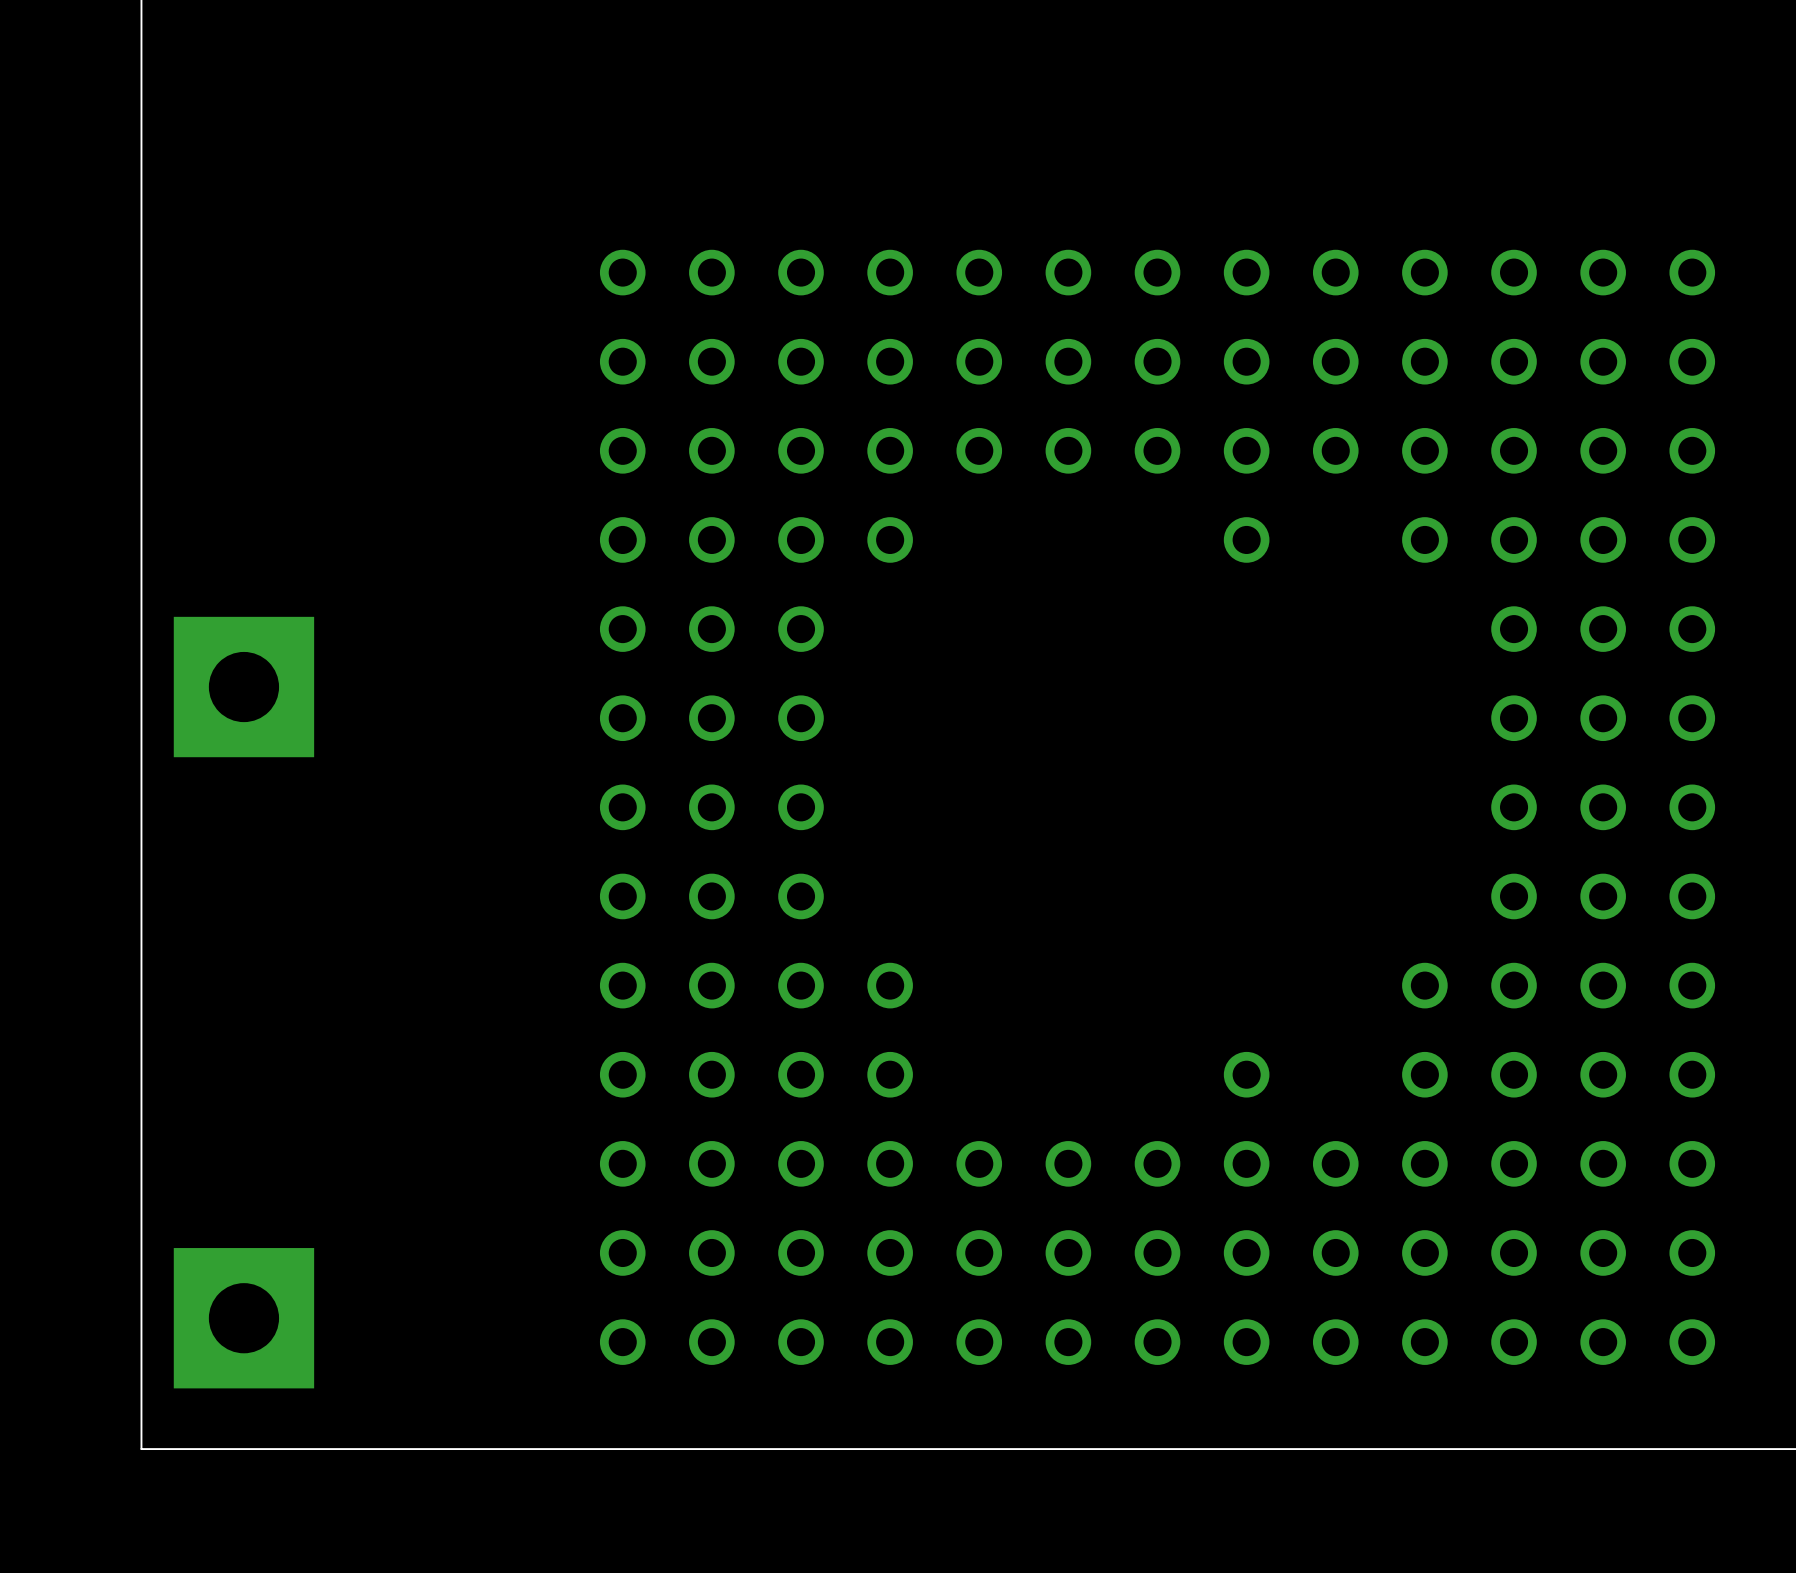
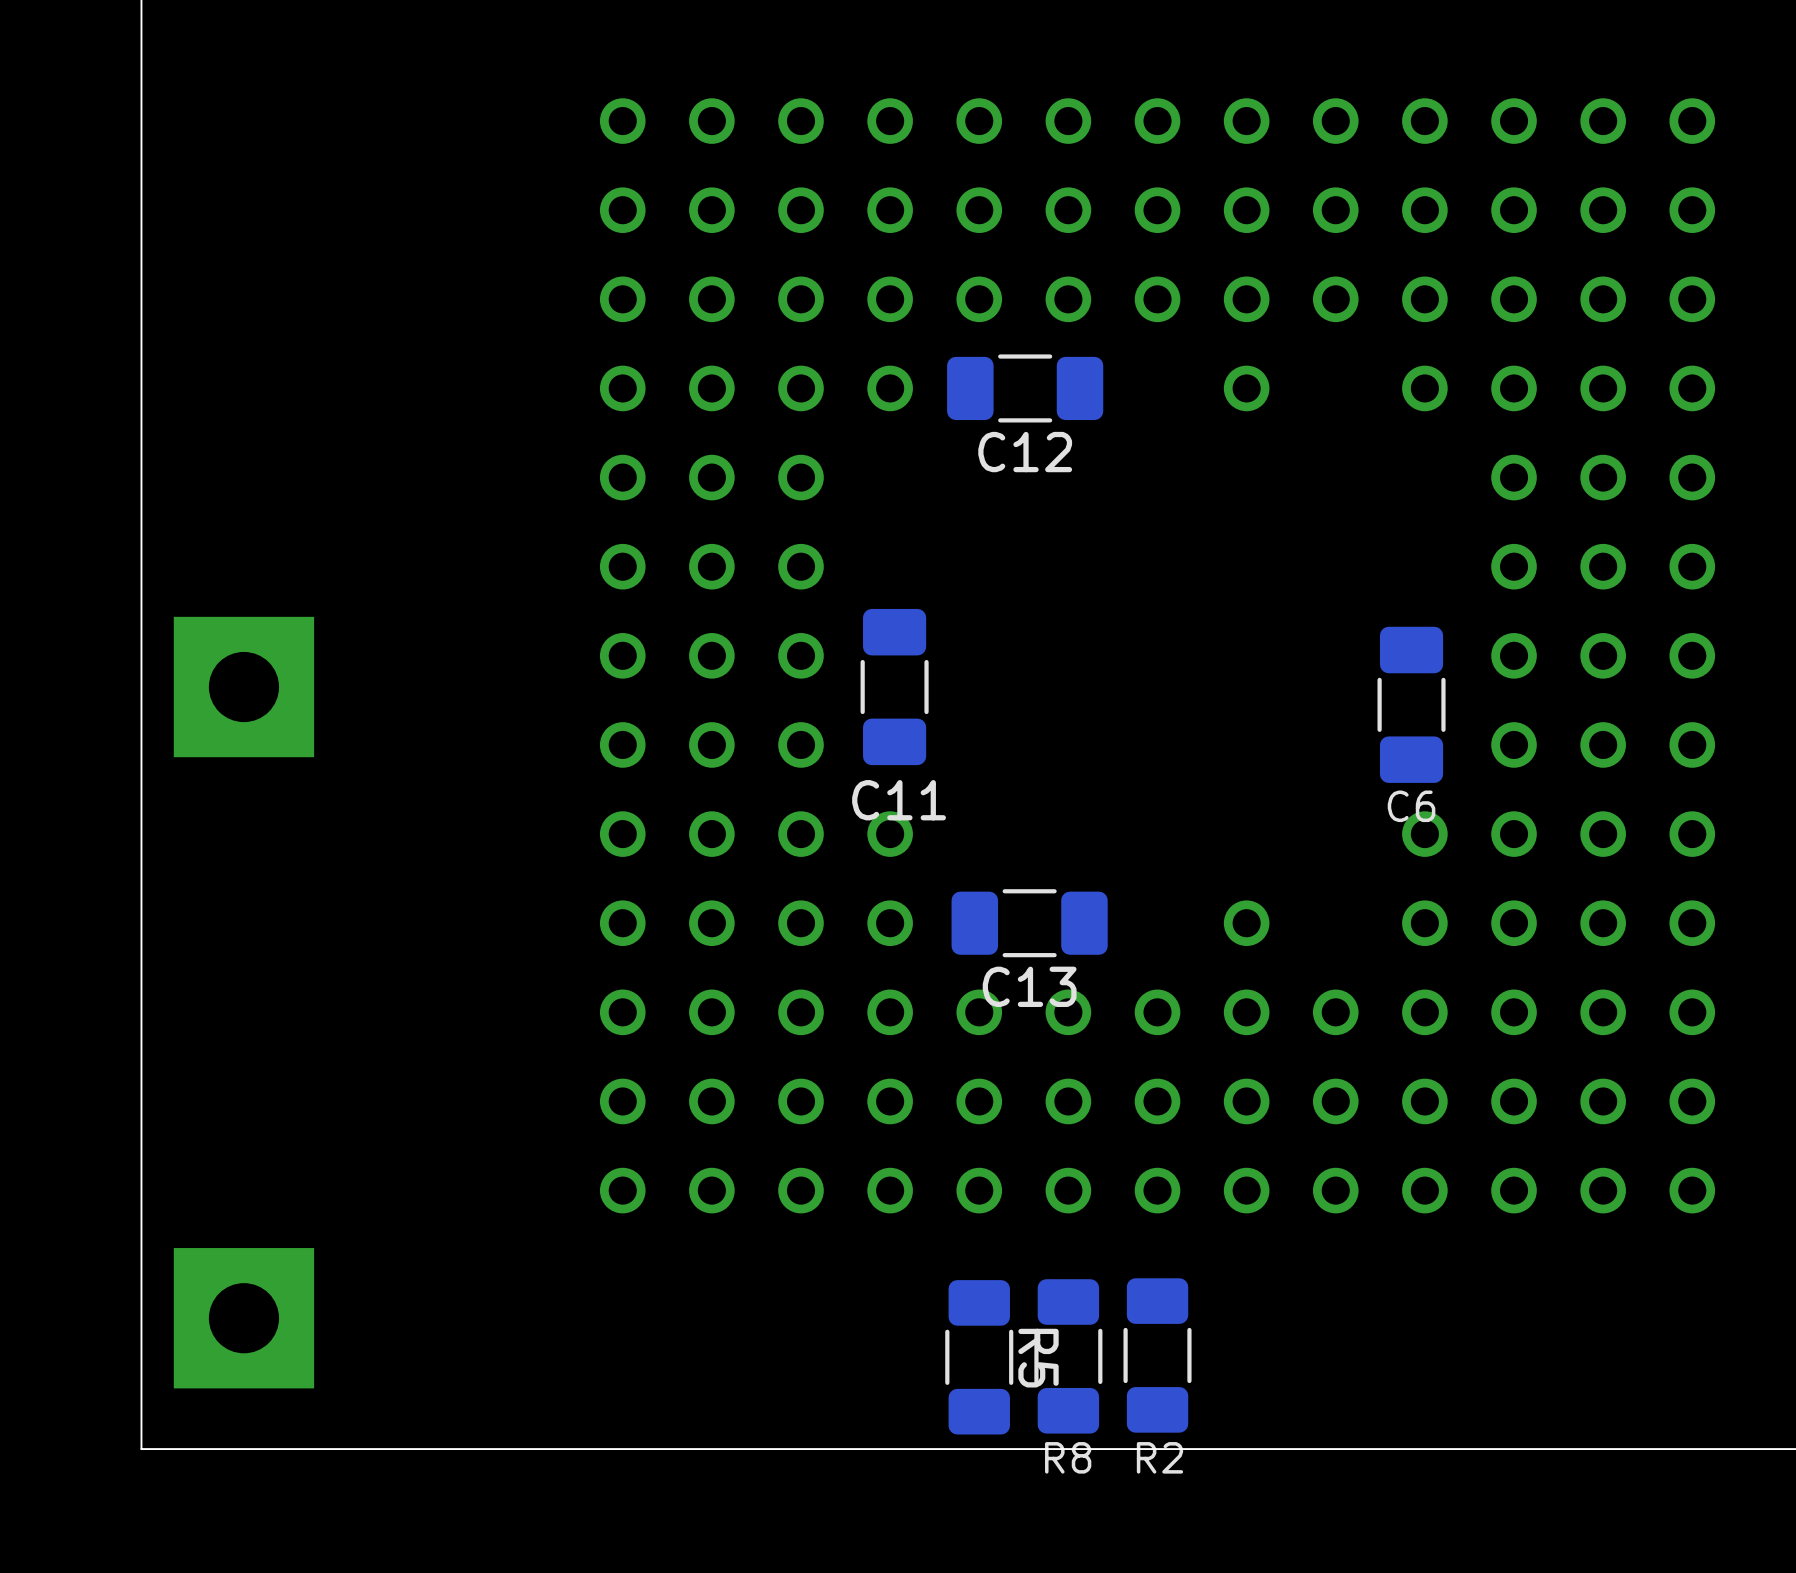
C12: none -> (1025, 388)
C11: none -> (894, 687)
C6: none -> (1411, 704)
part position: (1157, 807) -> (1157, 655)
C13: none -> (1029, 923)
R2: none -> (1157, 1355)
R8: none -> (1068, 1356)
R5: none -> (979, 1357)

